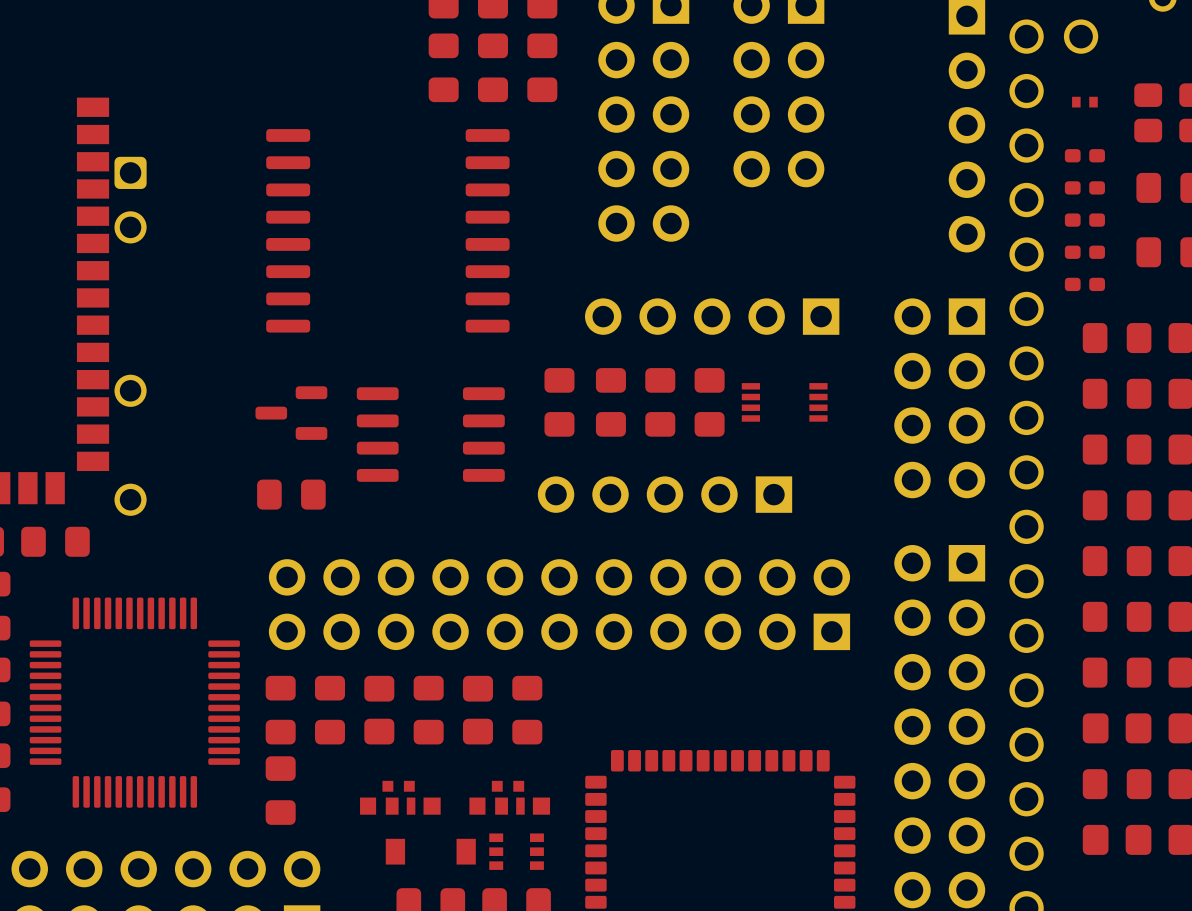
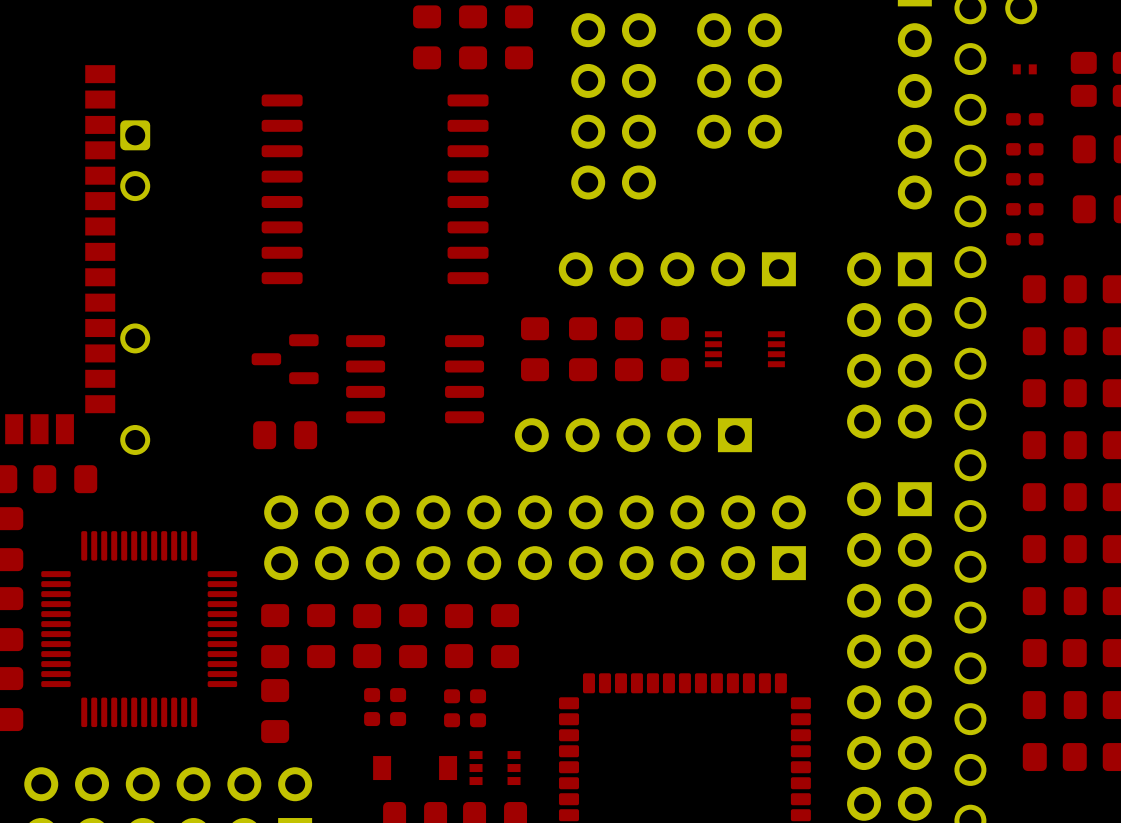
part footprint: [360, 780, 441, 815] -> [364, 688, 407, 727]
part: none -> (465, 708)
part: (509, 797) -> none

